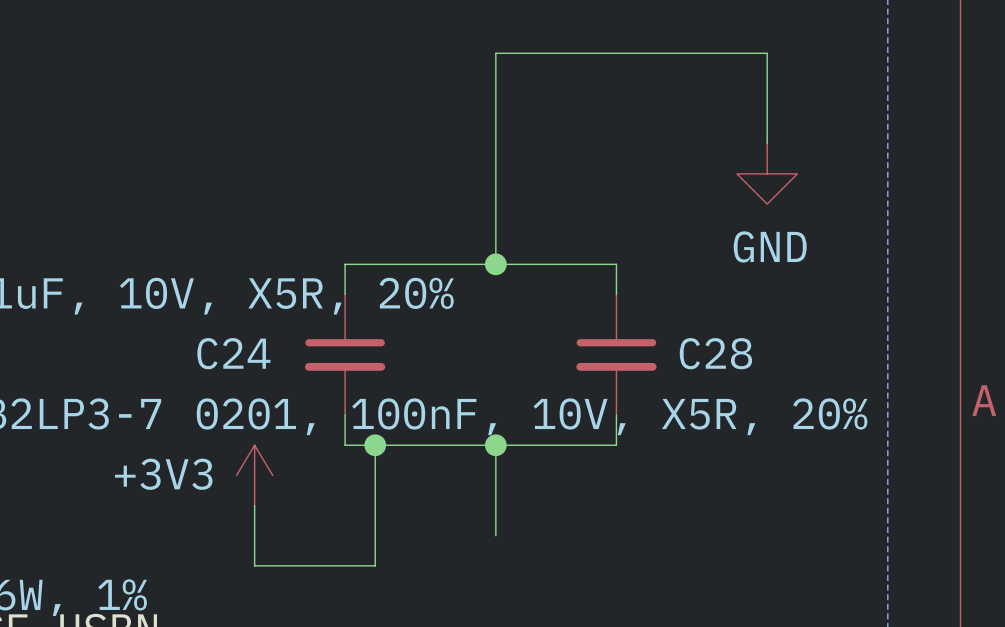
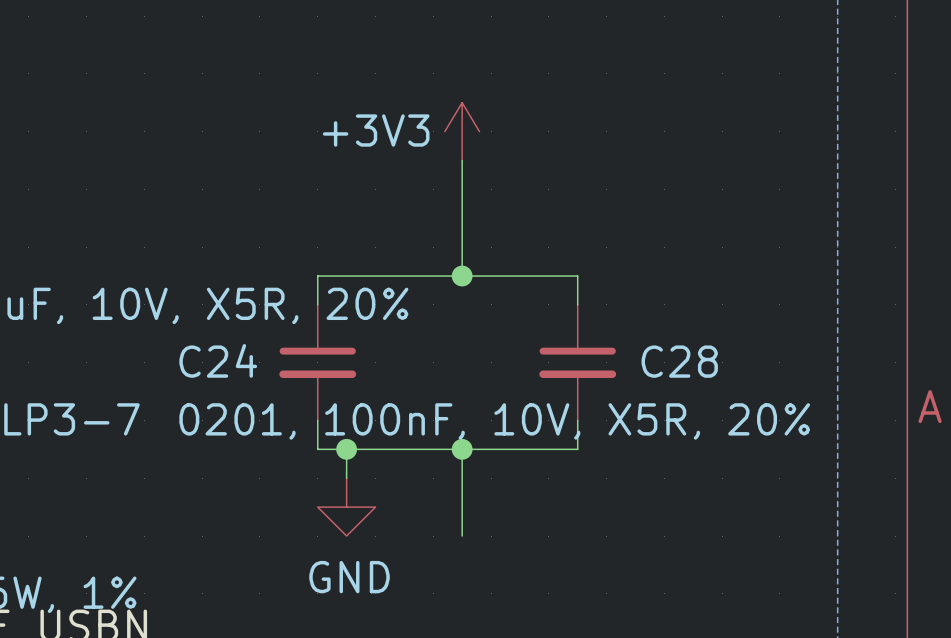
wire: (495, 143) (495, 53) (767, 53) (767, 143) -> none
power symbol position: GND (767, 173) -> GND (346, 507)
power symbol position: +3V3 (254, 475) -> +3V3 (462, 131)
wire: (375, 475) (375, 565) (254, 565) (254, 505) -> none

